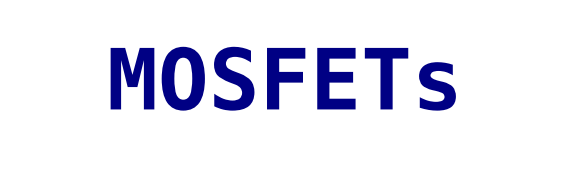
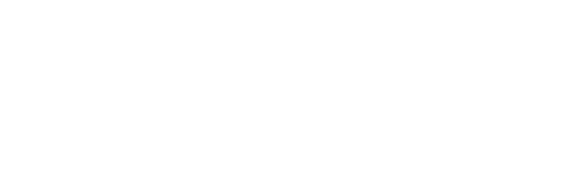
text: MOSFETs (283, 78) -> none

